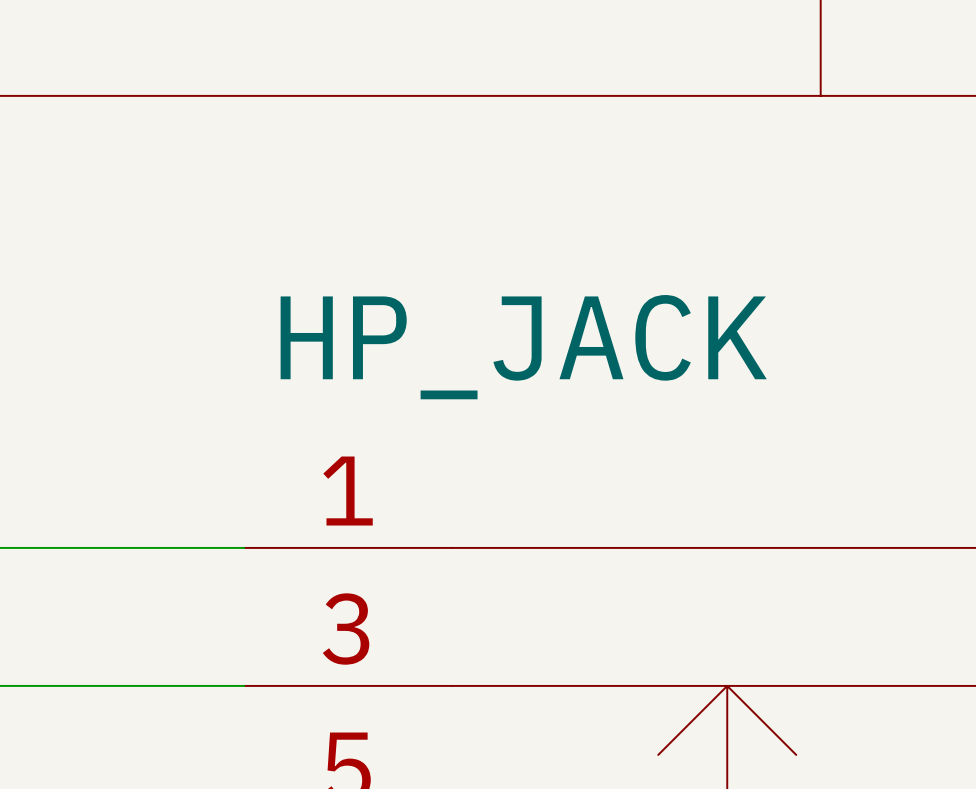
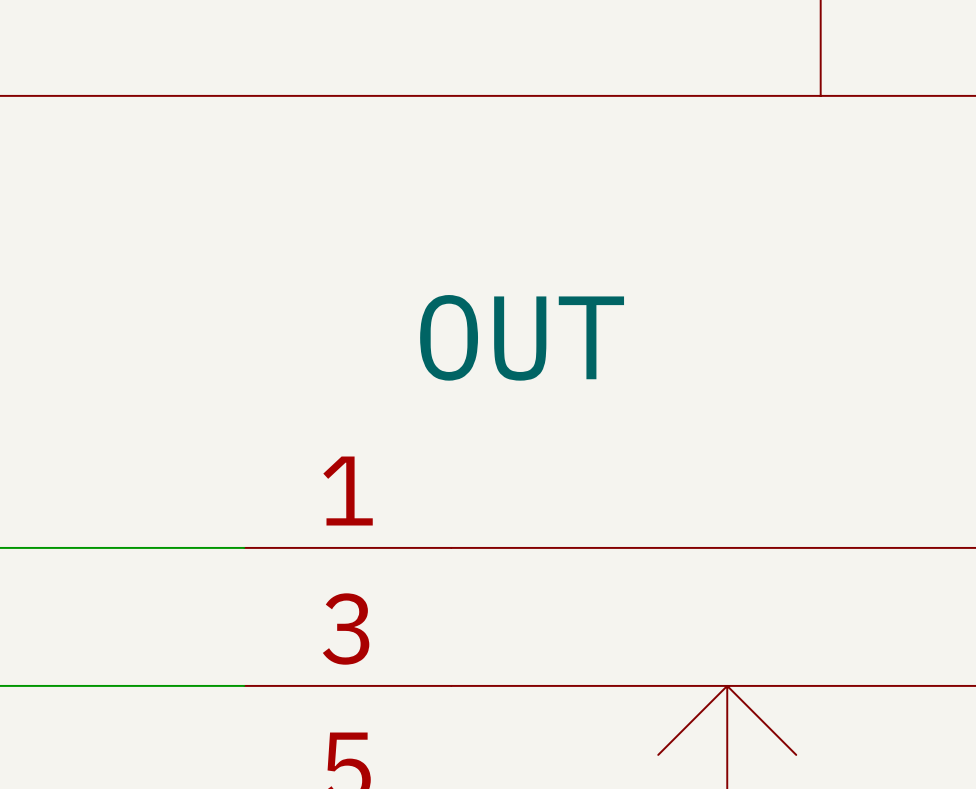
part value: HP_JACK (523, 347) -> OUT (522, 337)

